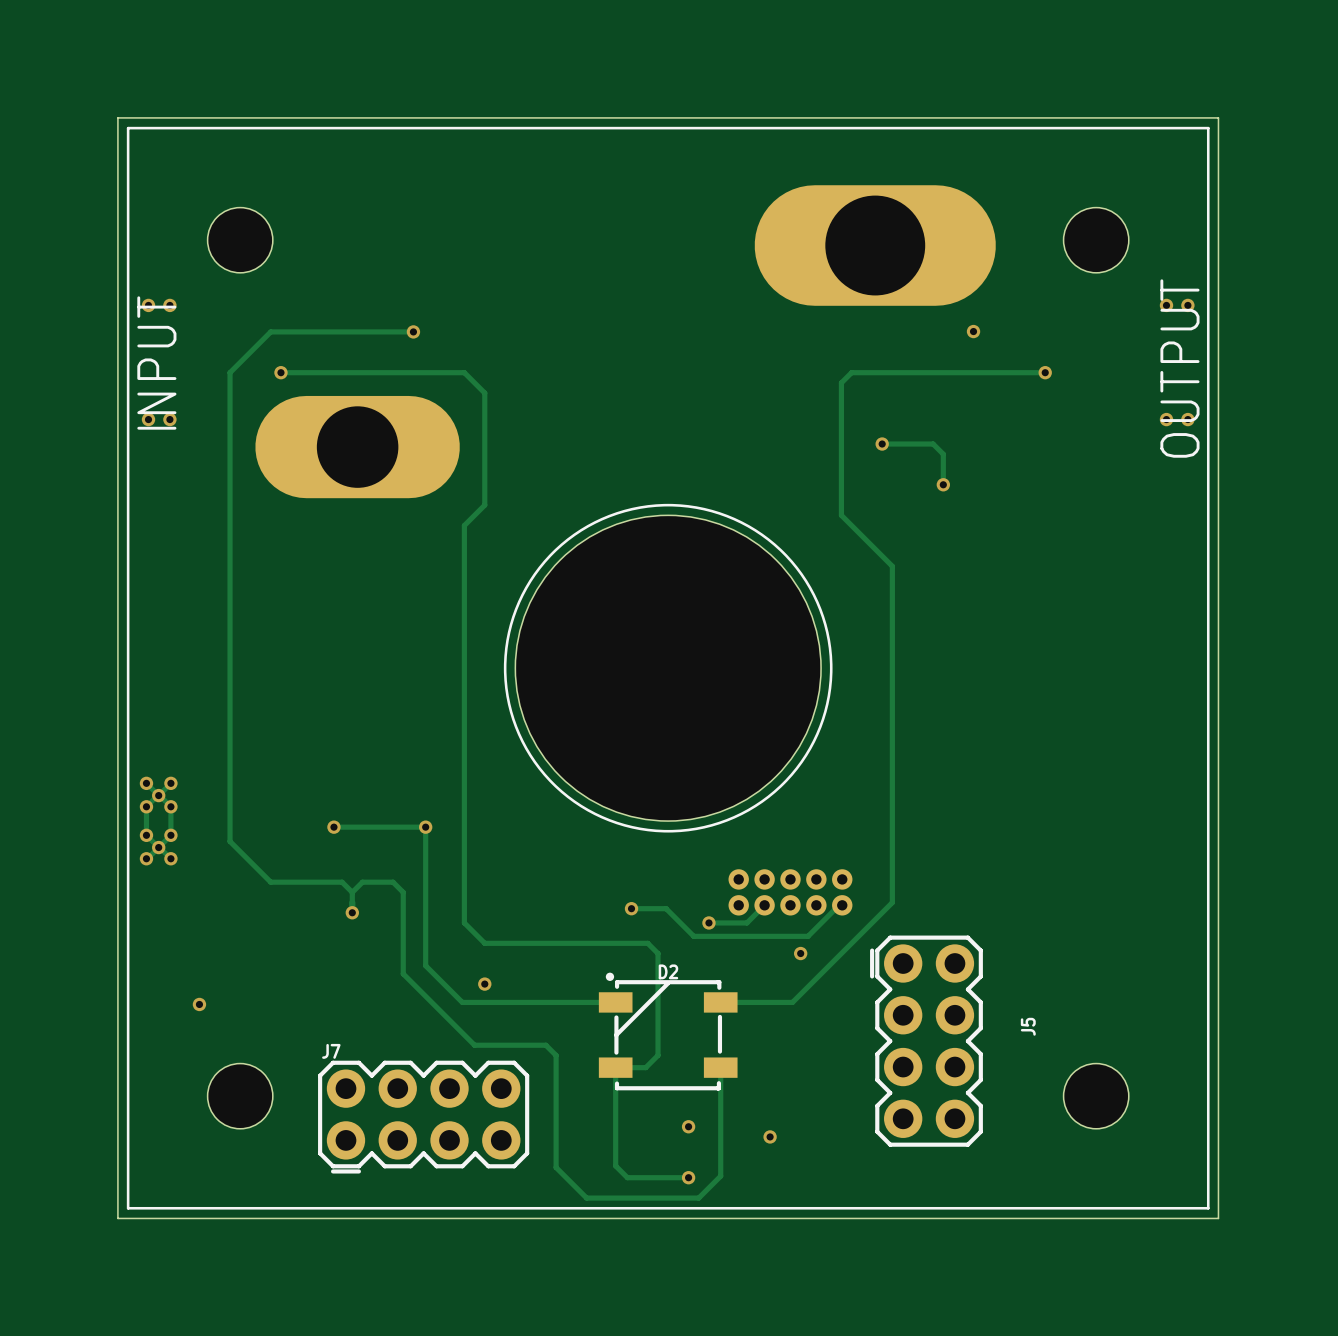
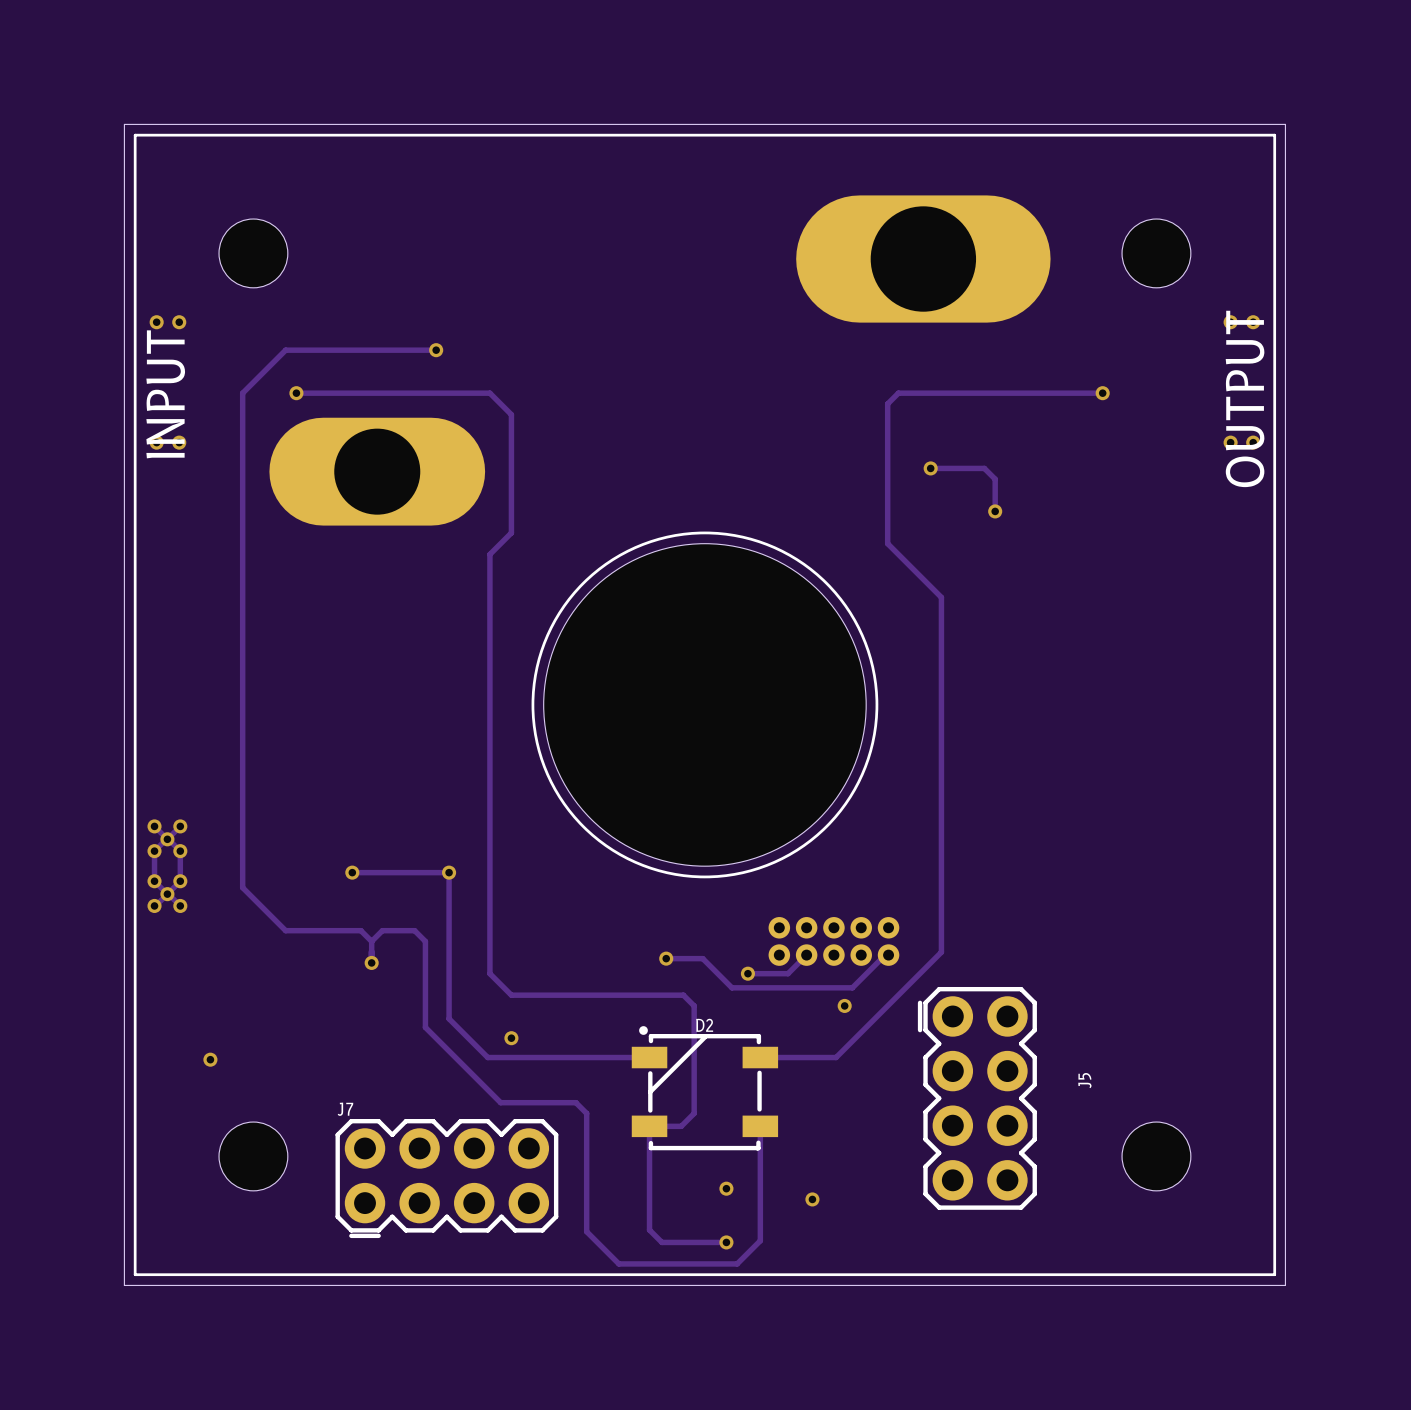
via: (973, 331) -> none

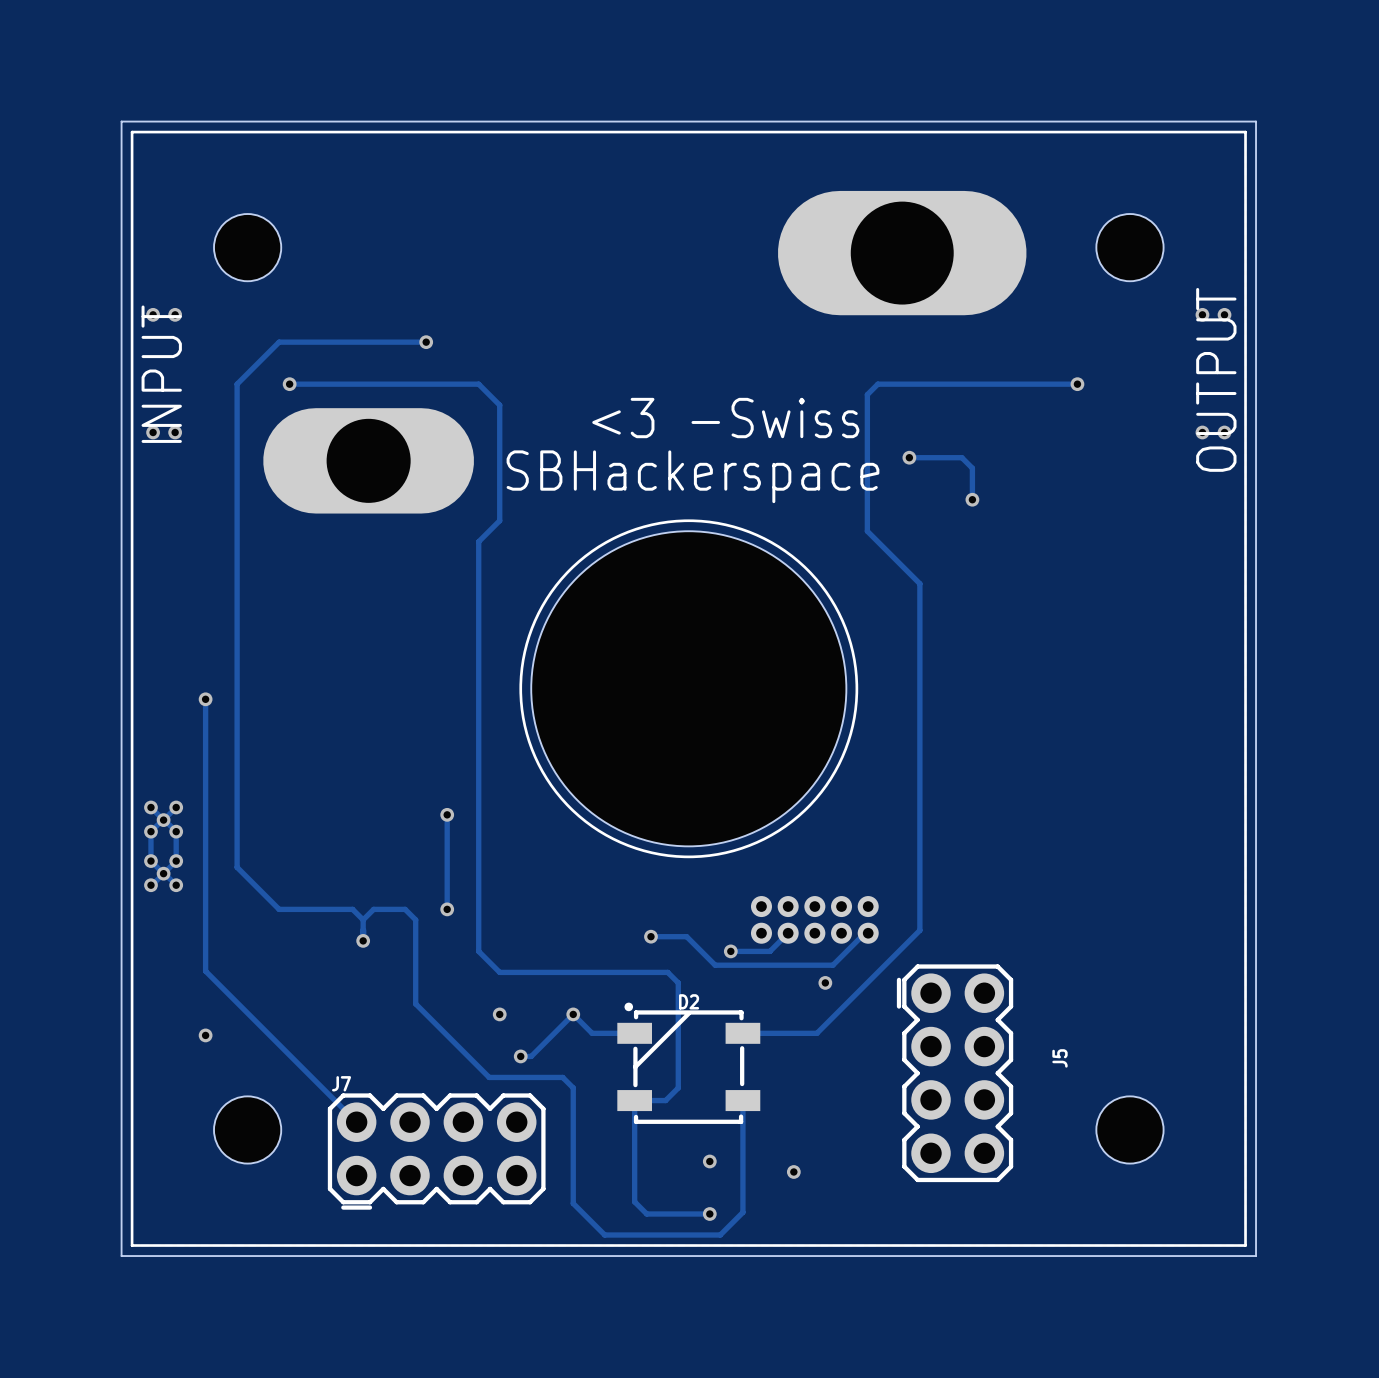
text: none -> <3 -Swiss (725, 418)
text: none -> SBHackerspace (692, 476)
track: none -> (205, 699) (205, 971) (356, 1122)
via: none -> (205, 699)
track: none -> (447, 814) (447, 909)
via: none -> (447, 814)
track: (352, 872) (449, 872) (449, 1018) (487, 1057) (606, 1057) -> (520, 1056) (531, 1056) (573, 1014) (592, 1033)
via: (352, 872) -> none
via: (449, 872) -> none
via: none -> (447, 909)
via: none -> (573, 1014)
via: none -> (520, 1056)

